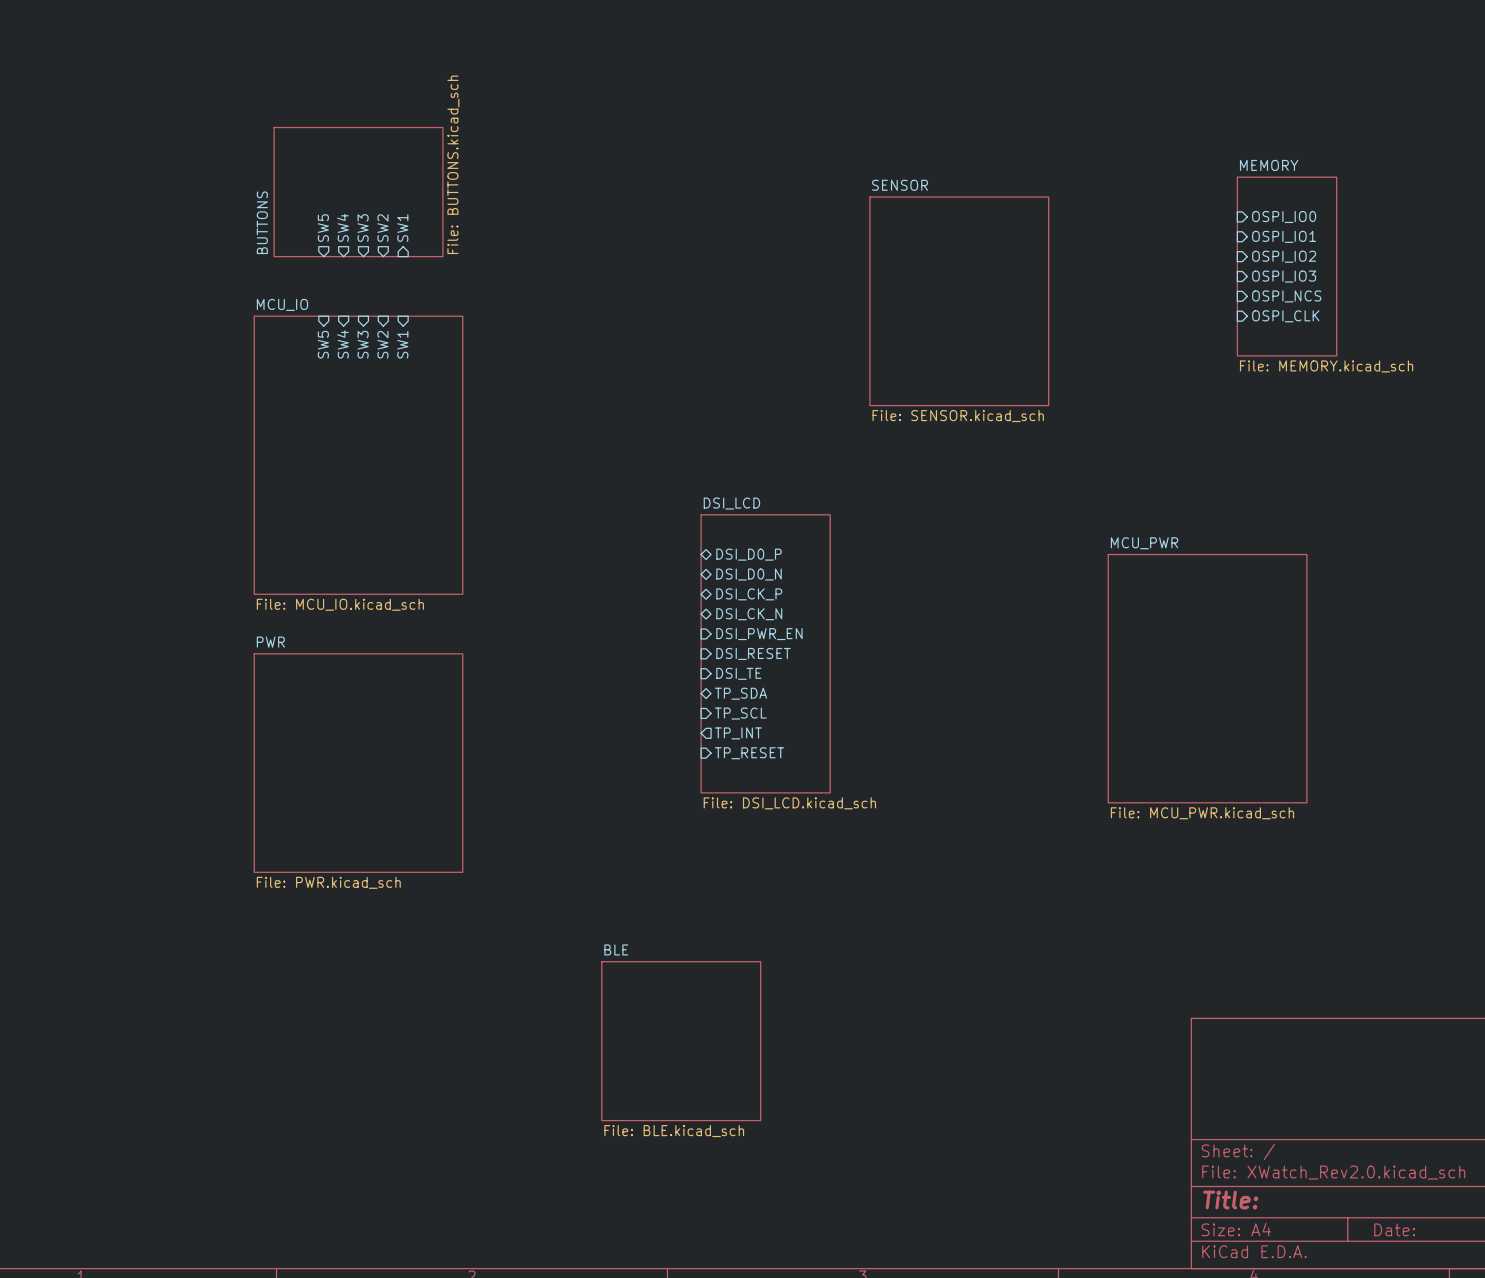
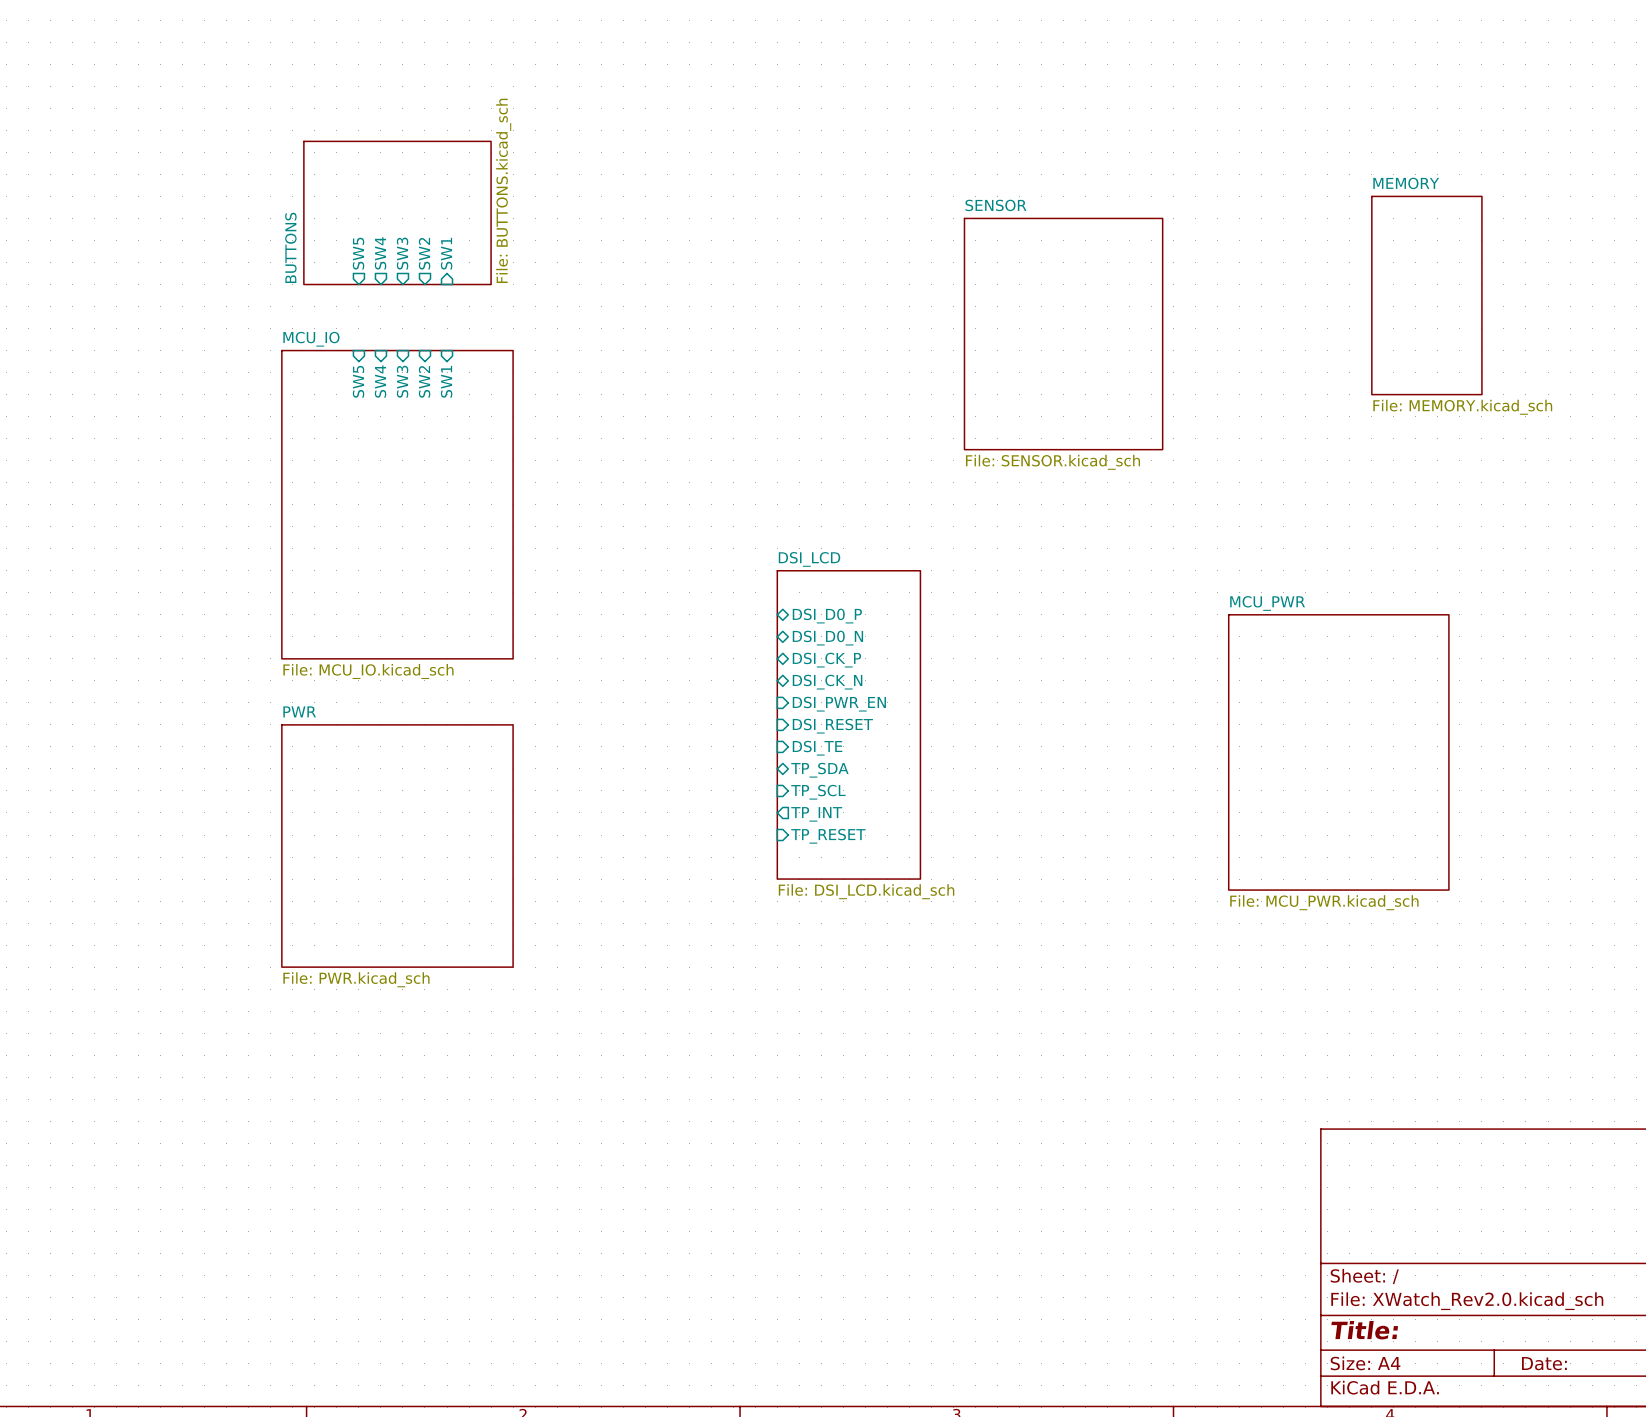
sheet pin: OSPI_IO0 (1284, 217) -> none
sheet pin: OSPI_IO1 (1284, 236) -> none
sheet pin: OSPI_IO2 (1284, 256) -> none
sheet pin: OSPI_IO3 (1284, 276) -> none
sheet pin: OSPI_NCS (1286, 296) -> none
sheet pin: OSPI_CLK (1285, 316) -> none
sheet BLE: File: BLE.kicad_sch (681, 1041) -> none

